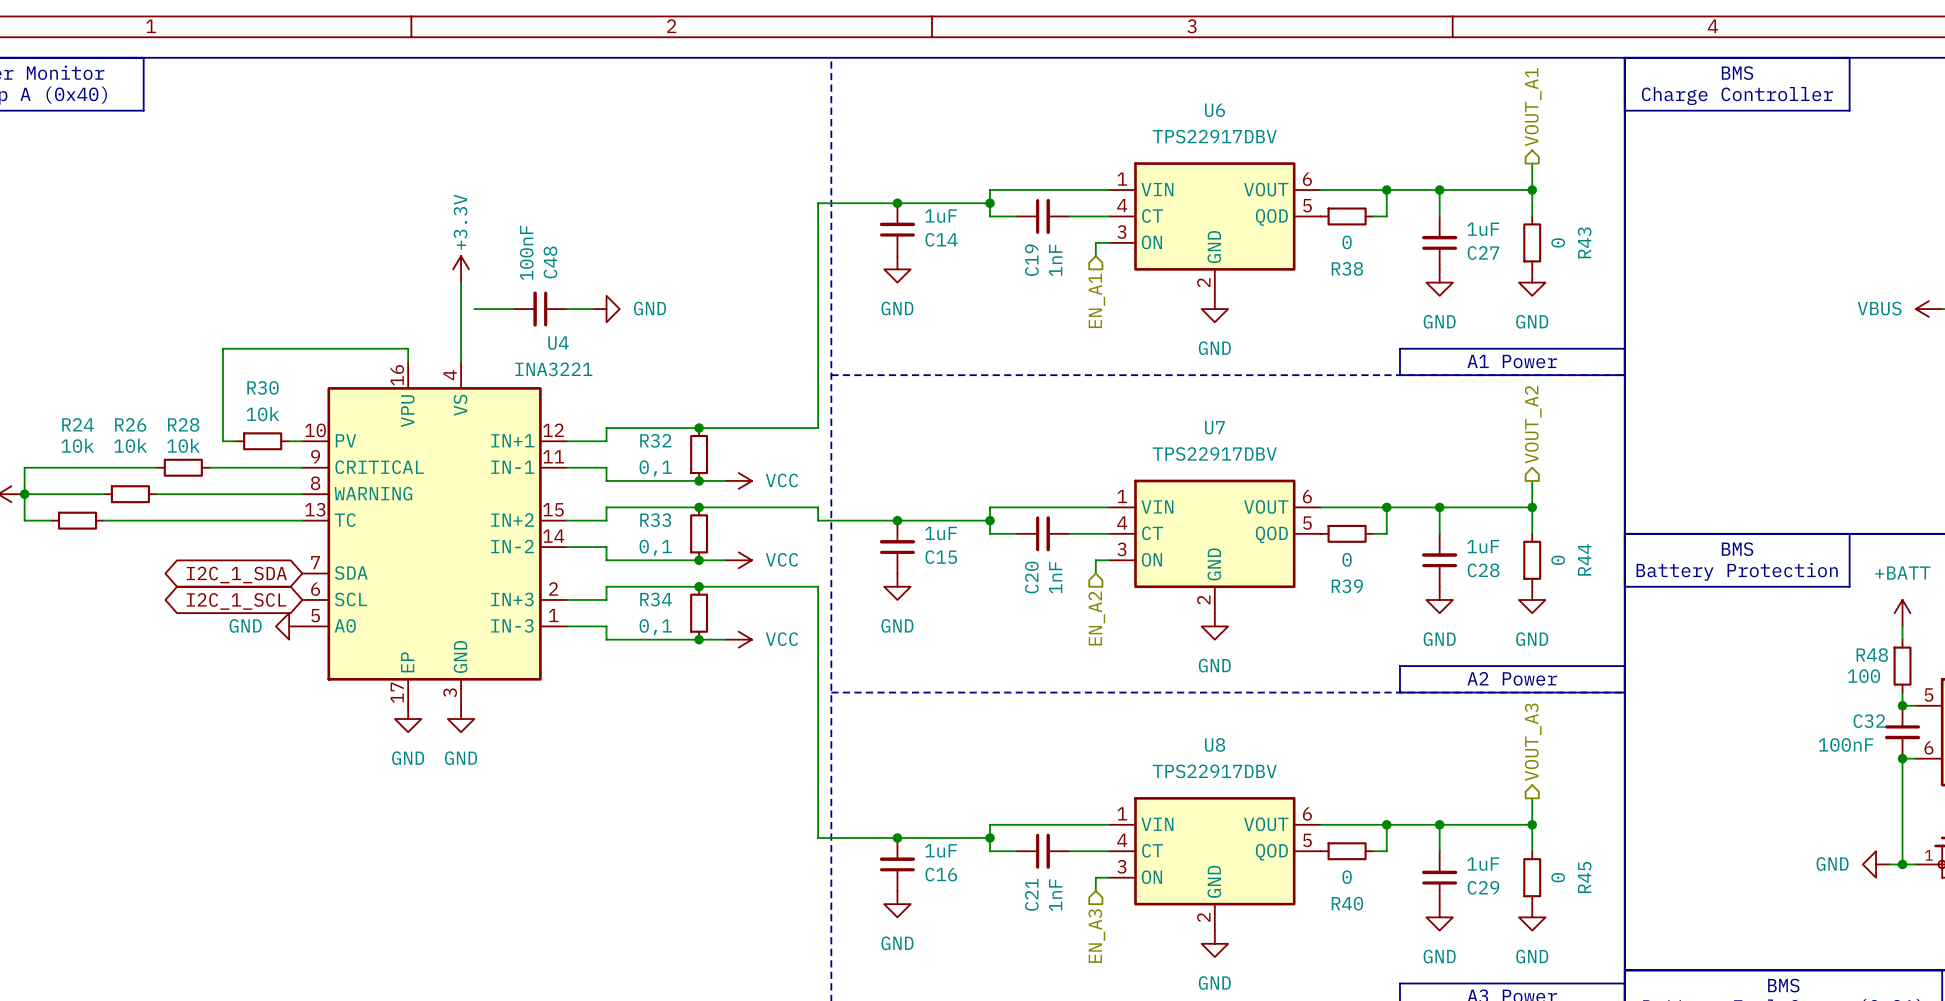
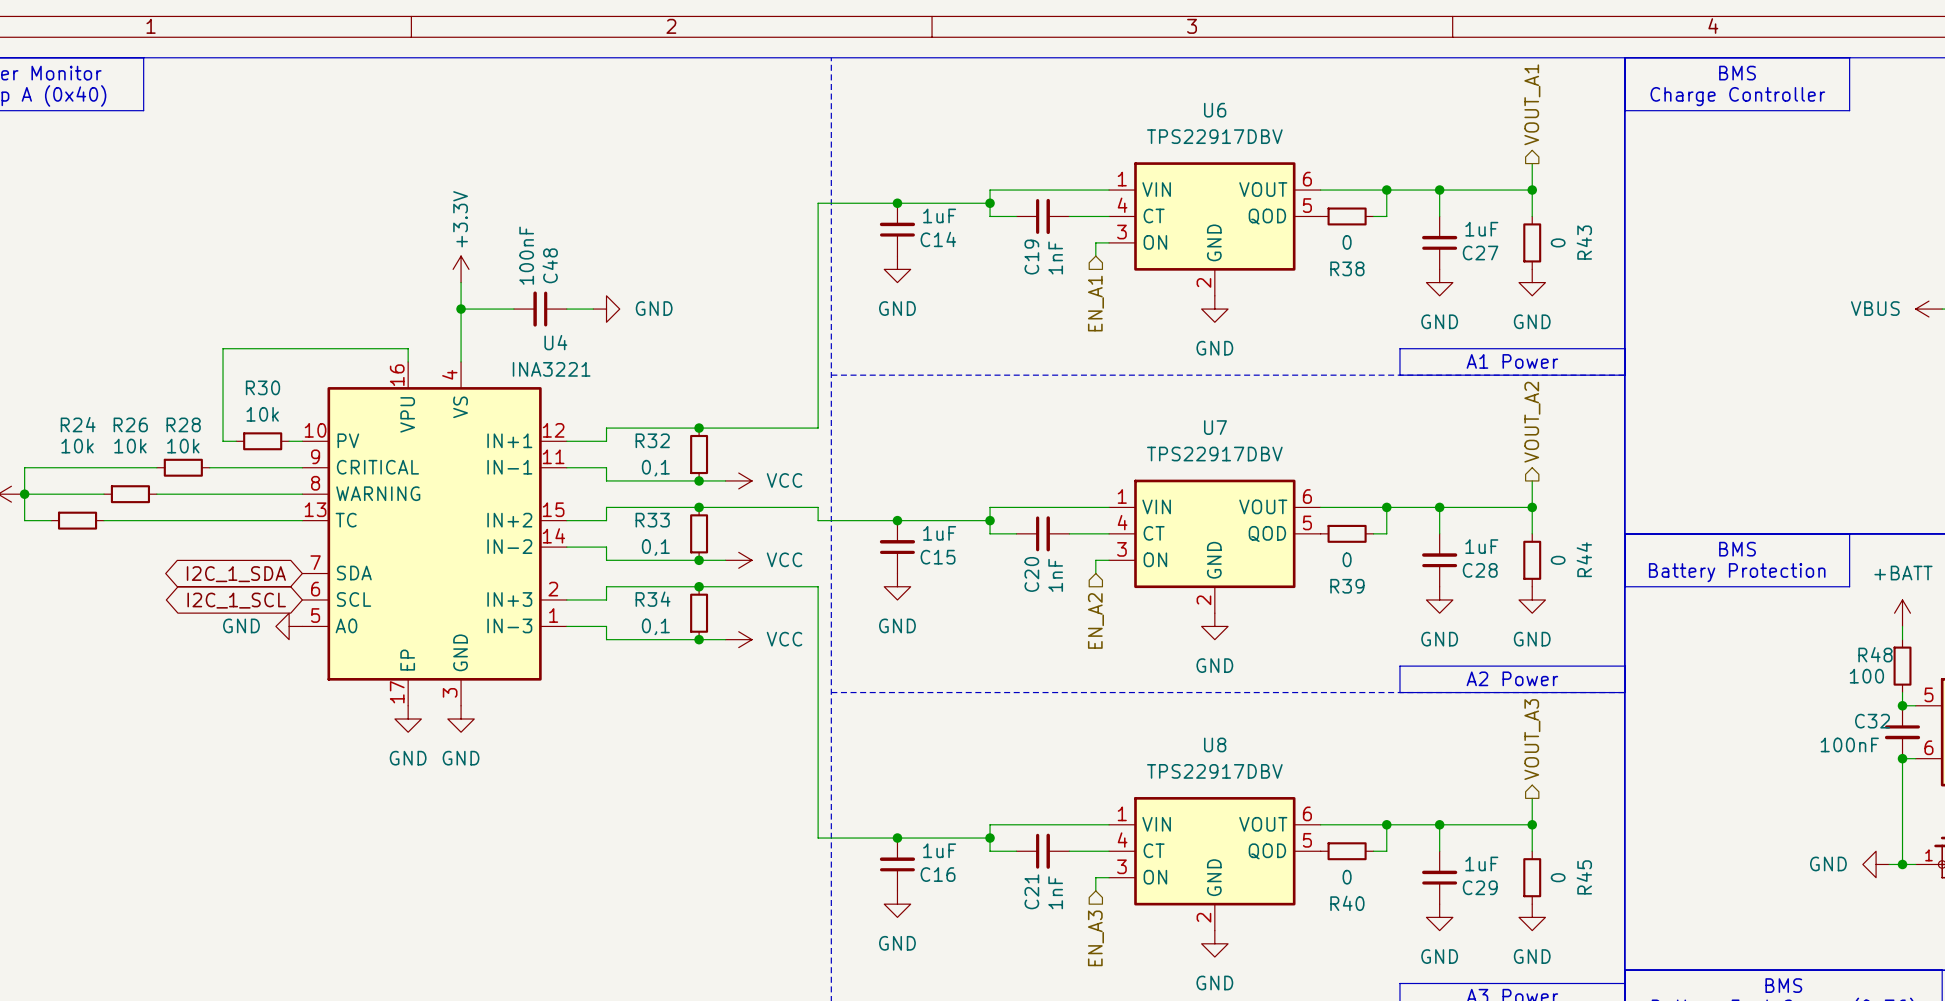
wire: none -> (461, 309) (474, 309)
junction: none -> (461, 309)

